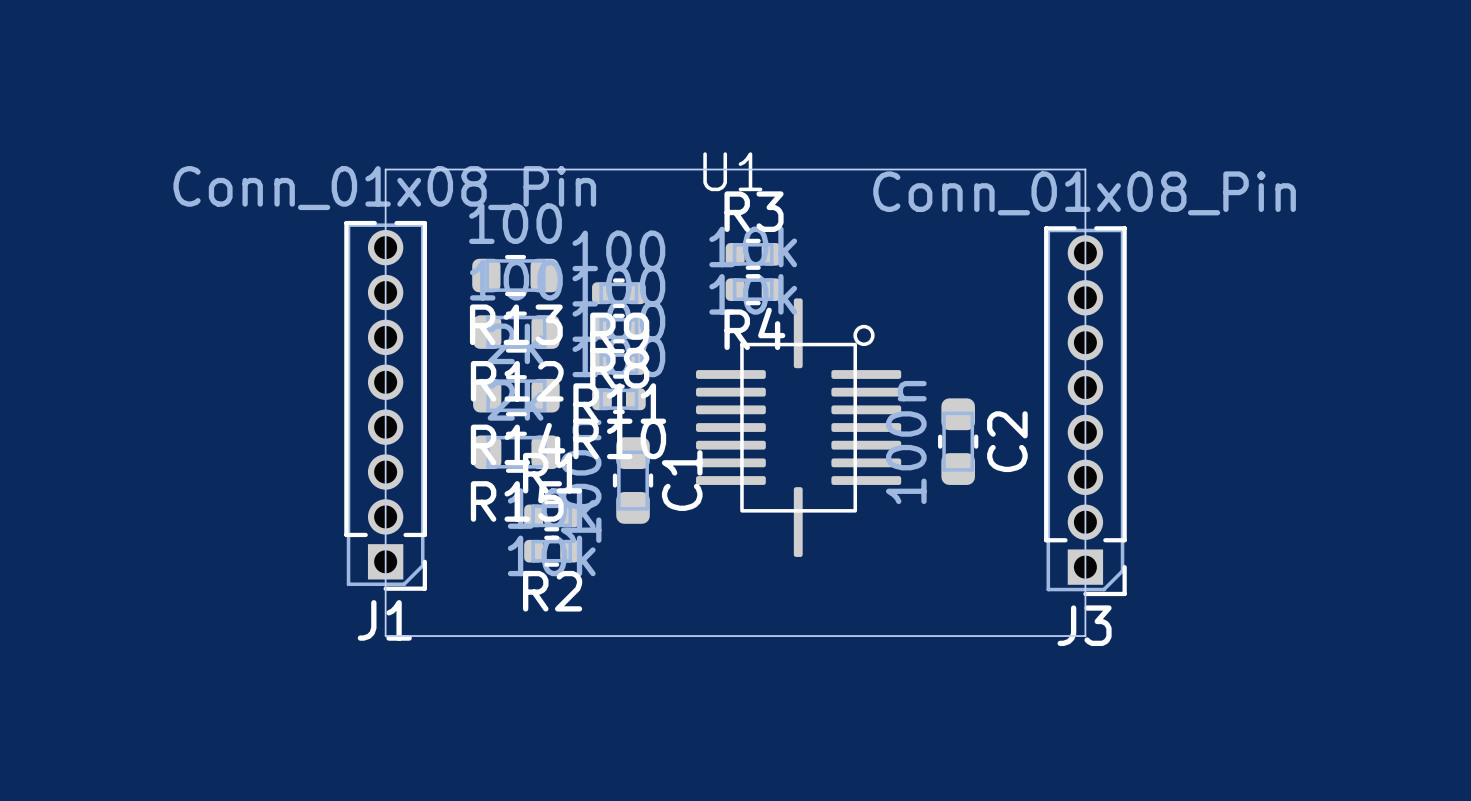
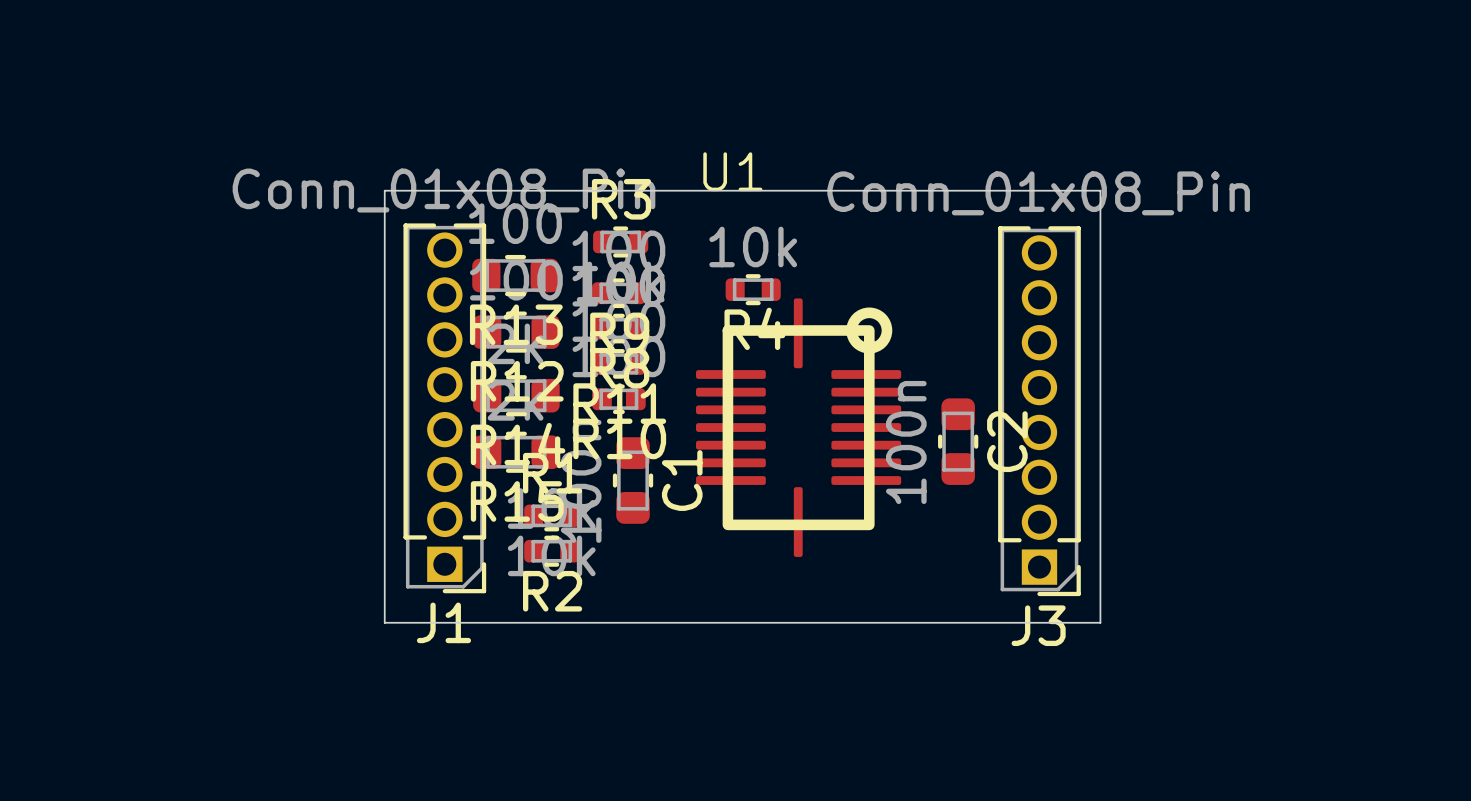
board edge: (385, 169) (1085, 169) (1085, 636) (385, 636) (385, 169) -> (384, 190) (384, 622) (1100, 622) (1100, 190) (384, 190)
R3 position: (753, 254) -> (620, 241)
U1 footprint: [696, 298, 902, 557] -> [696, 298, 902, 557]
J1 position: (385, 405) -> (444, 408)
J3 position: (1085, 411) -> (1039, 411)

